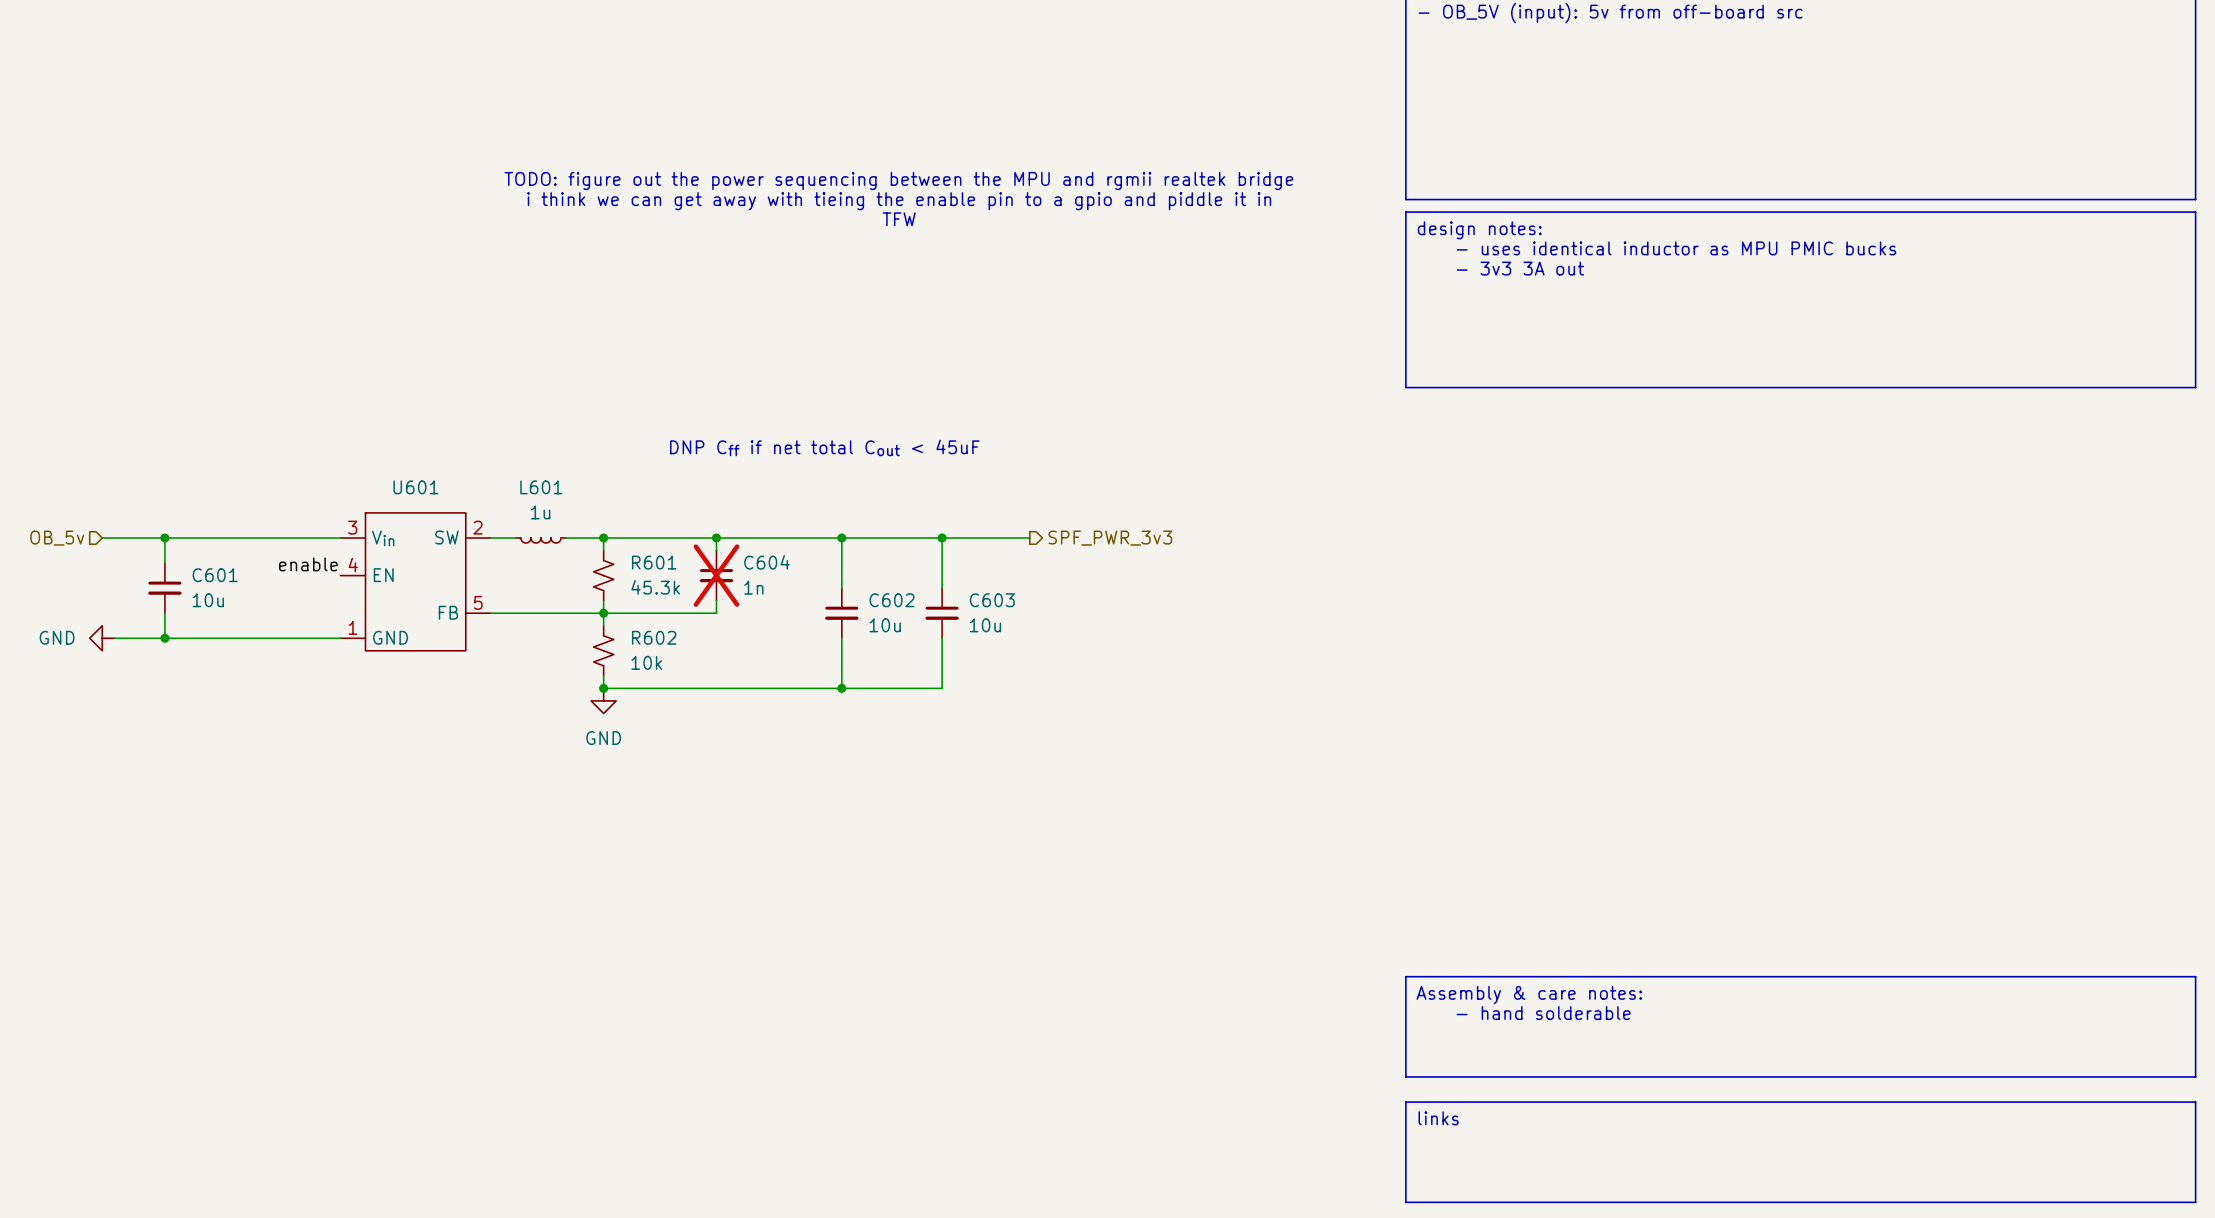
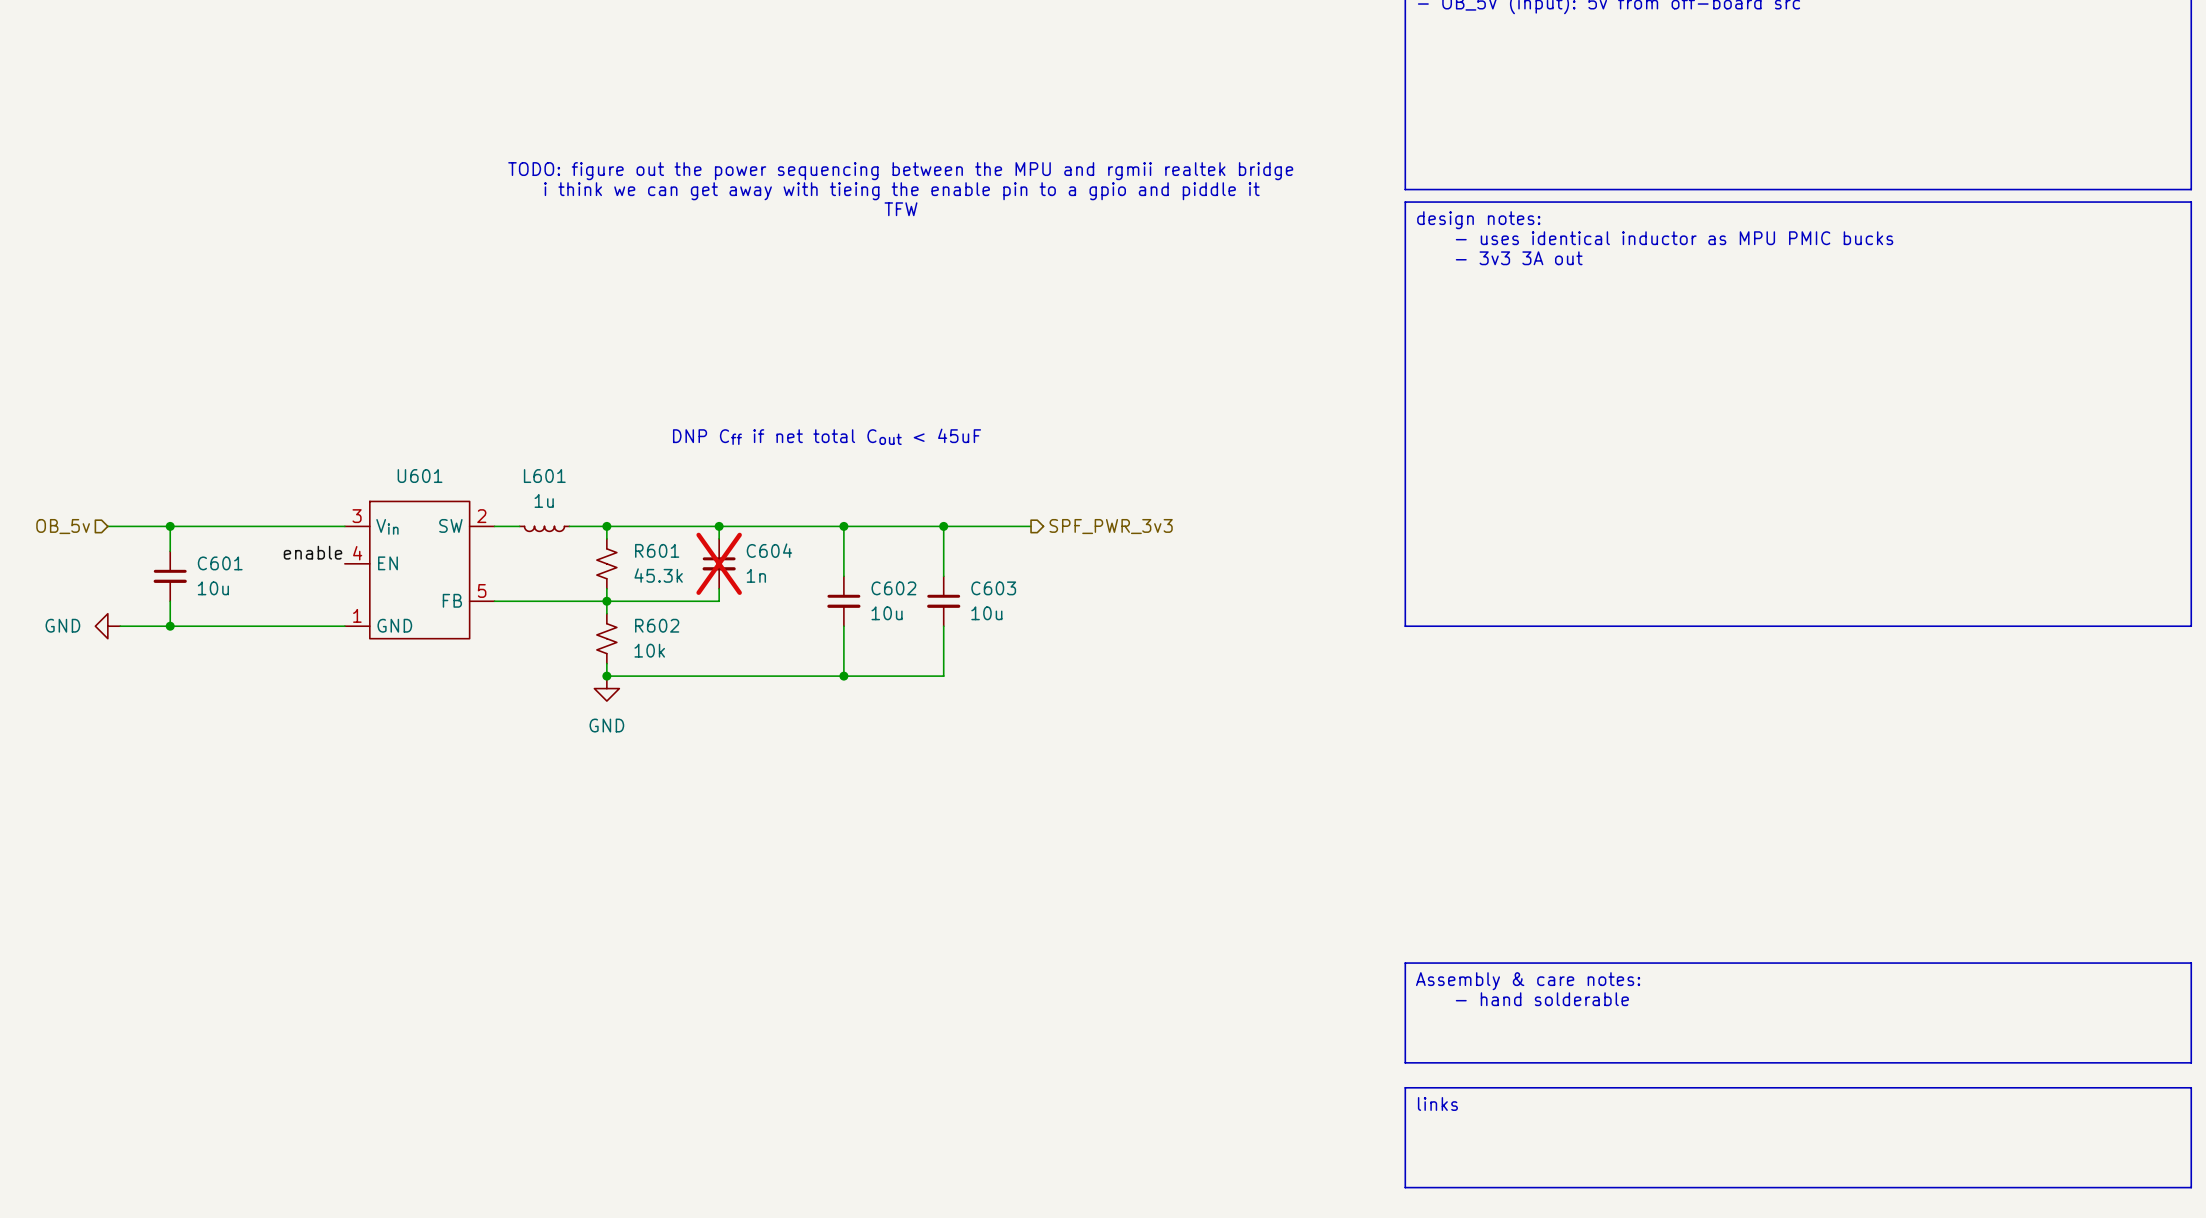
text: i think we can get away with tieing the enable pin to a gpio and piddle it in (899, 201) -> i think we can get away with tieing the enable pin to a gpio and piddle it (901, 191)
line: (1405, 387) (2195, 387) -> (1405, 376) (1405, 626) (2191, 626) (2191, 376)

